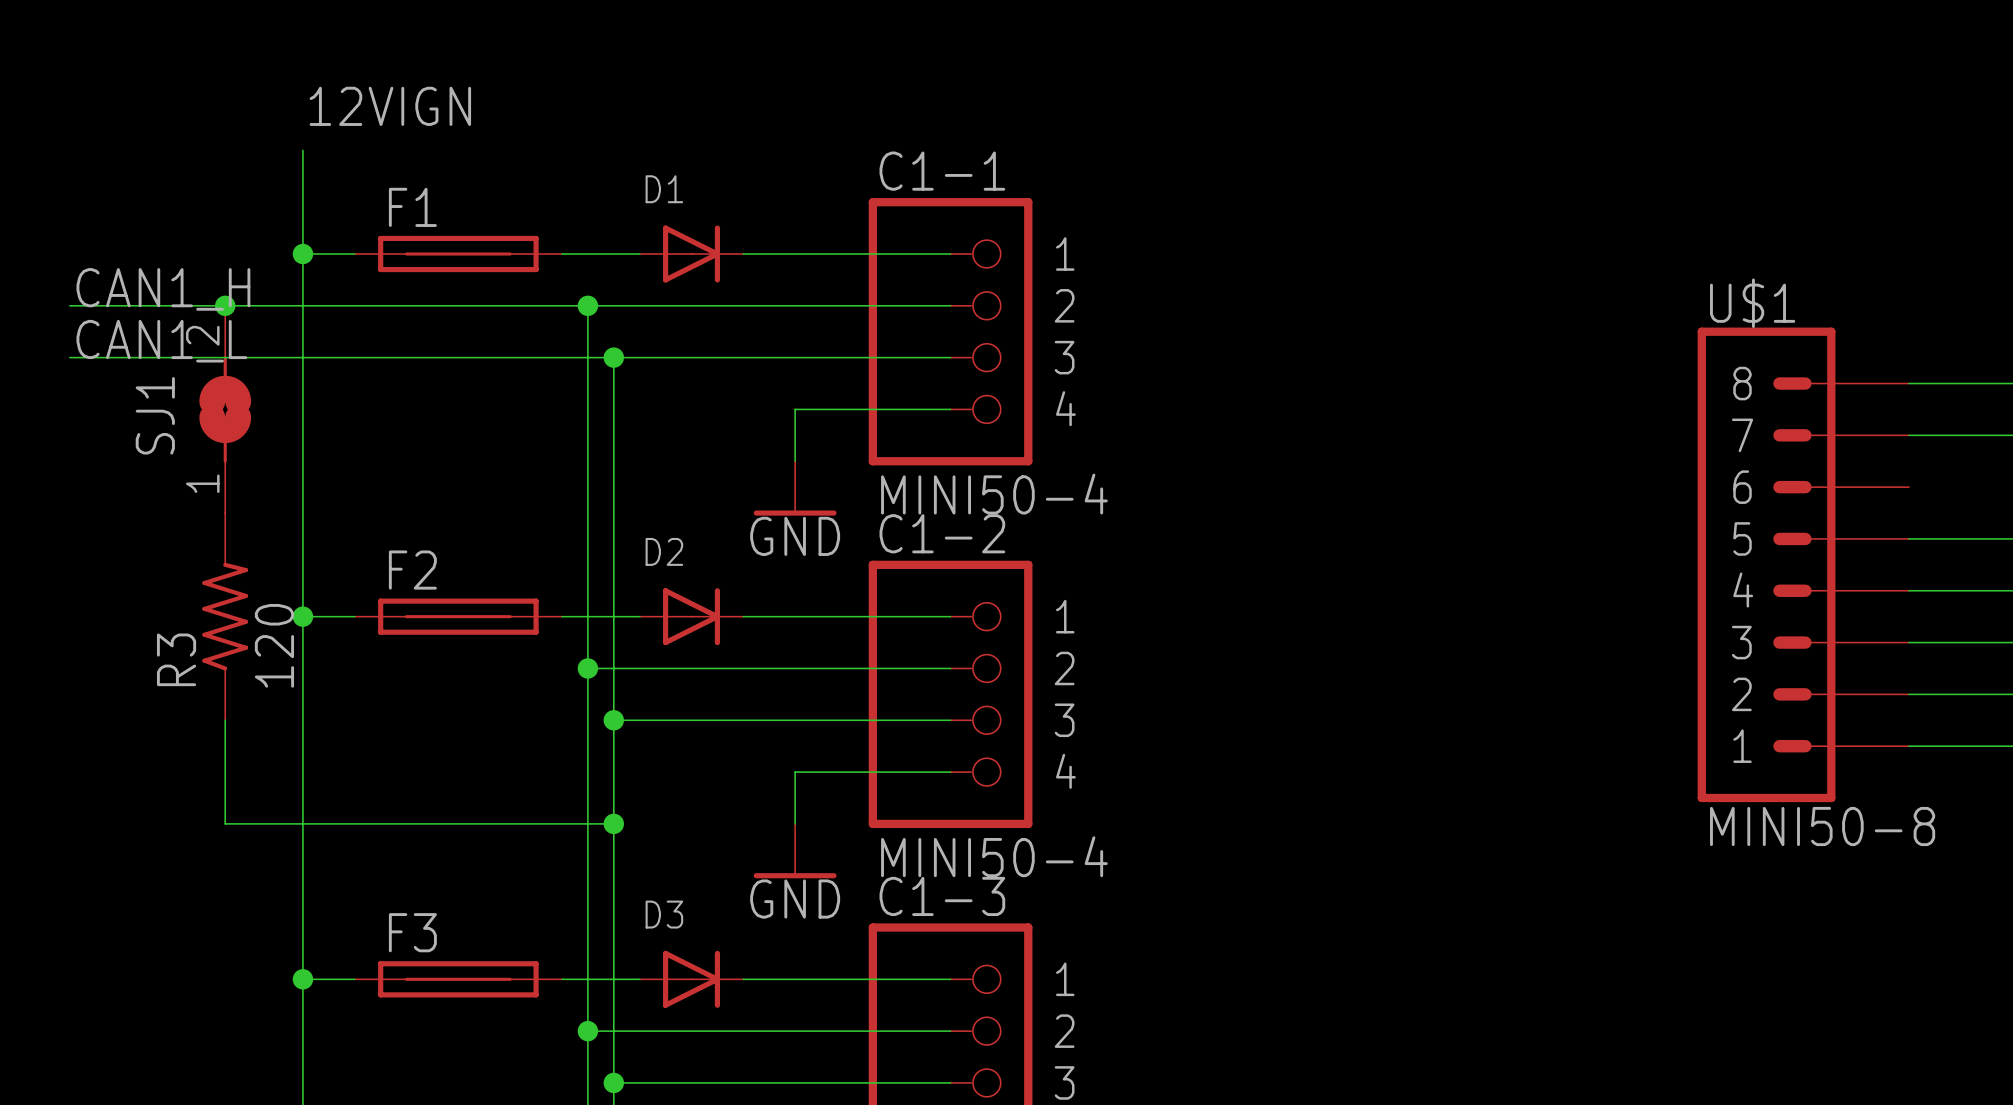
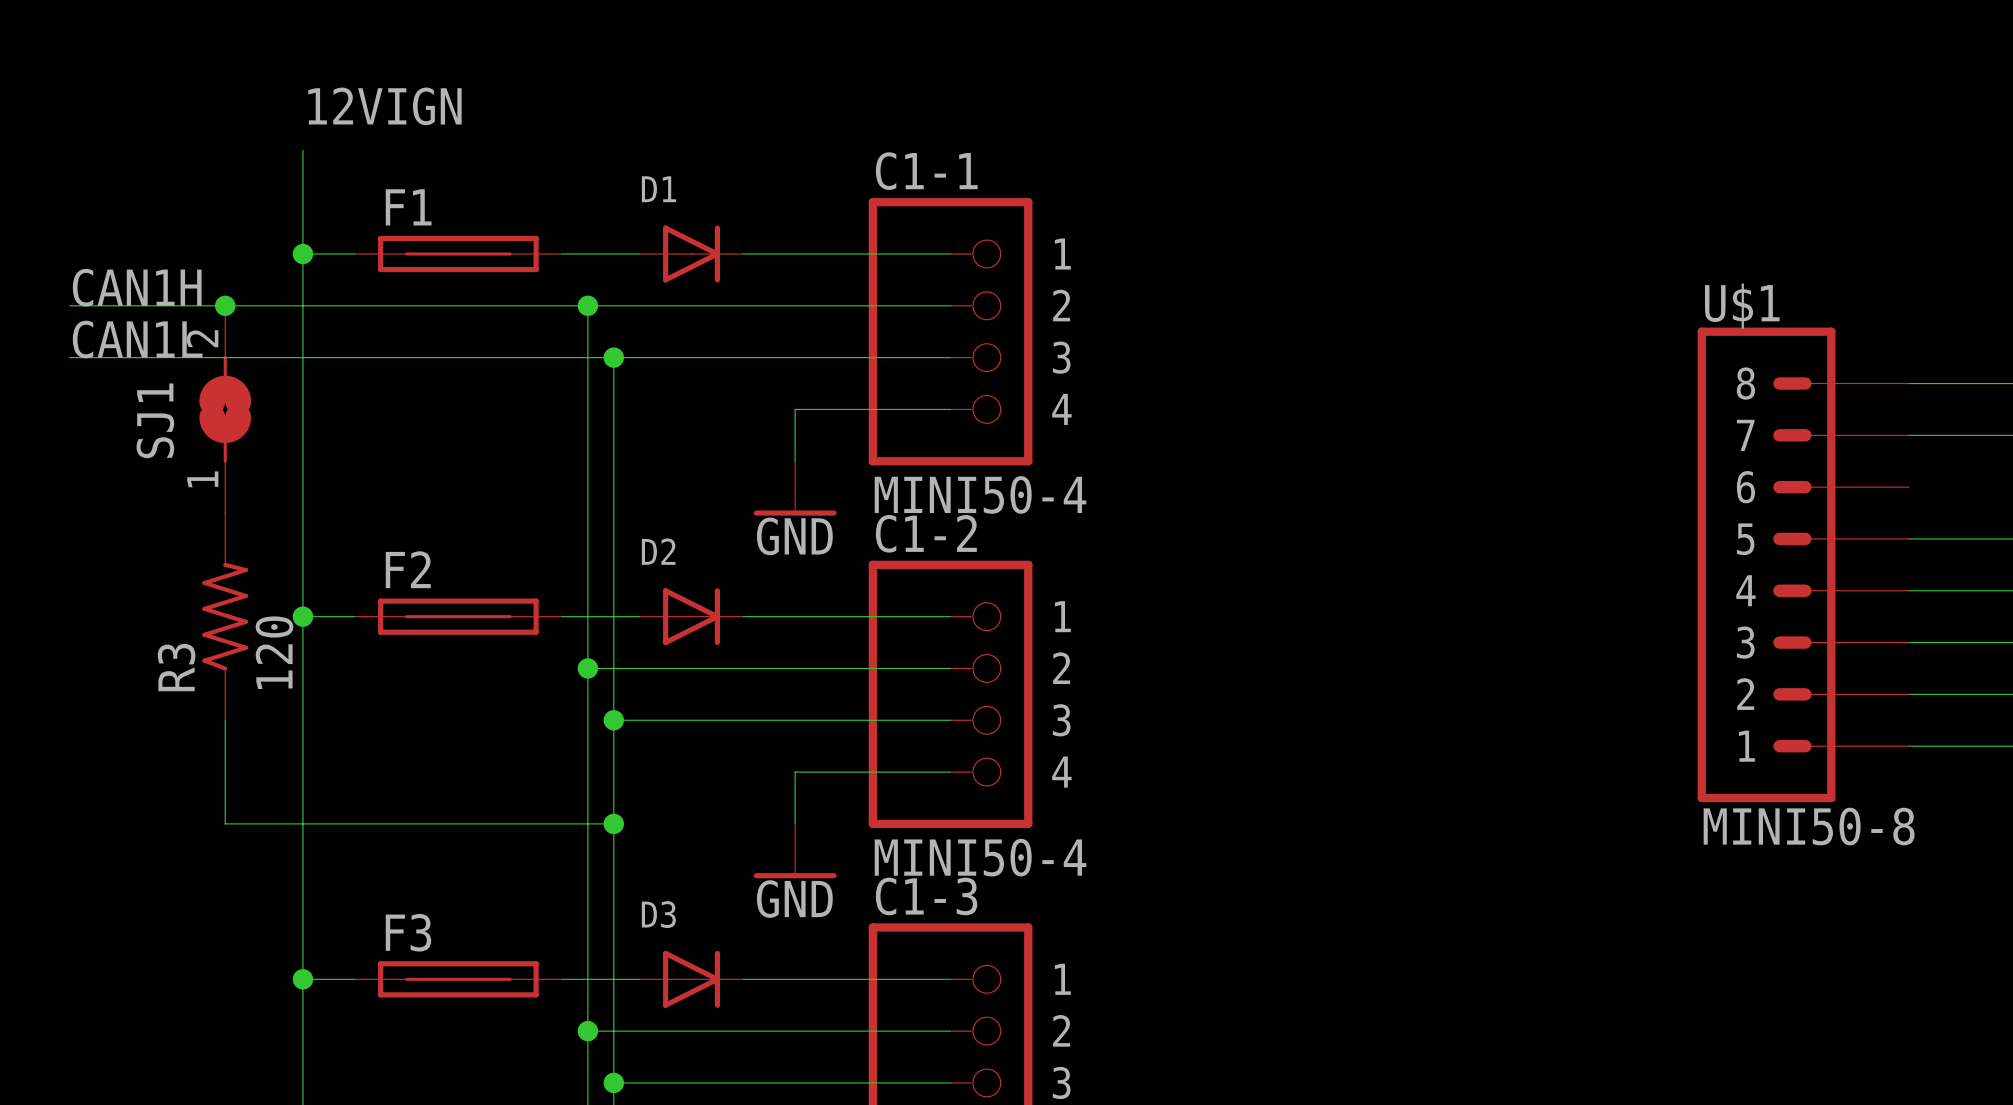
label: CAN1_H (163, 289) -> CAN1H (137, 287)
label: CAN1_L (161, 341) -> CAN1L (137, 339)

